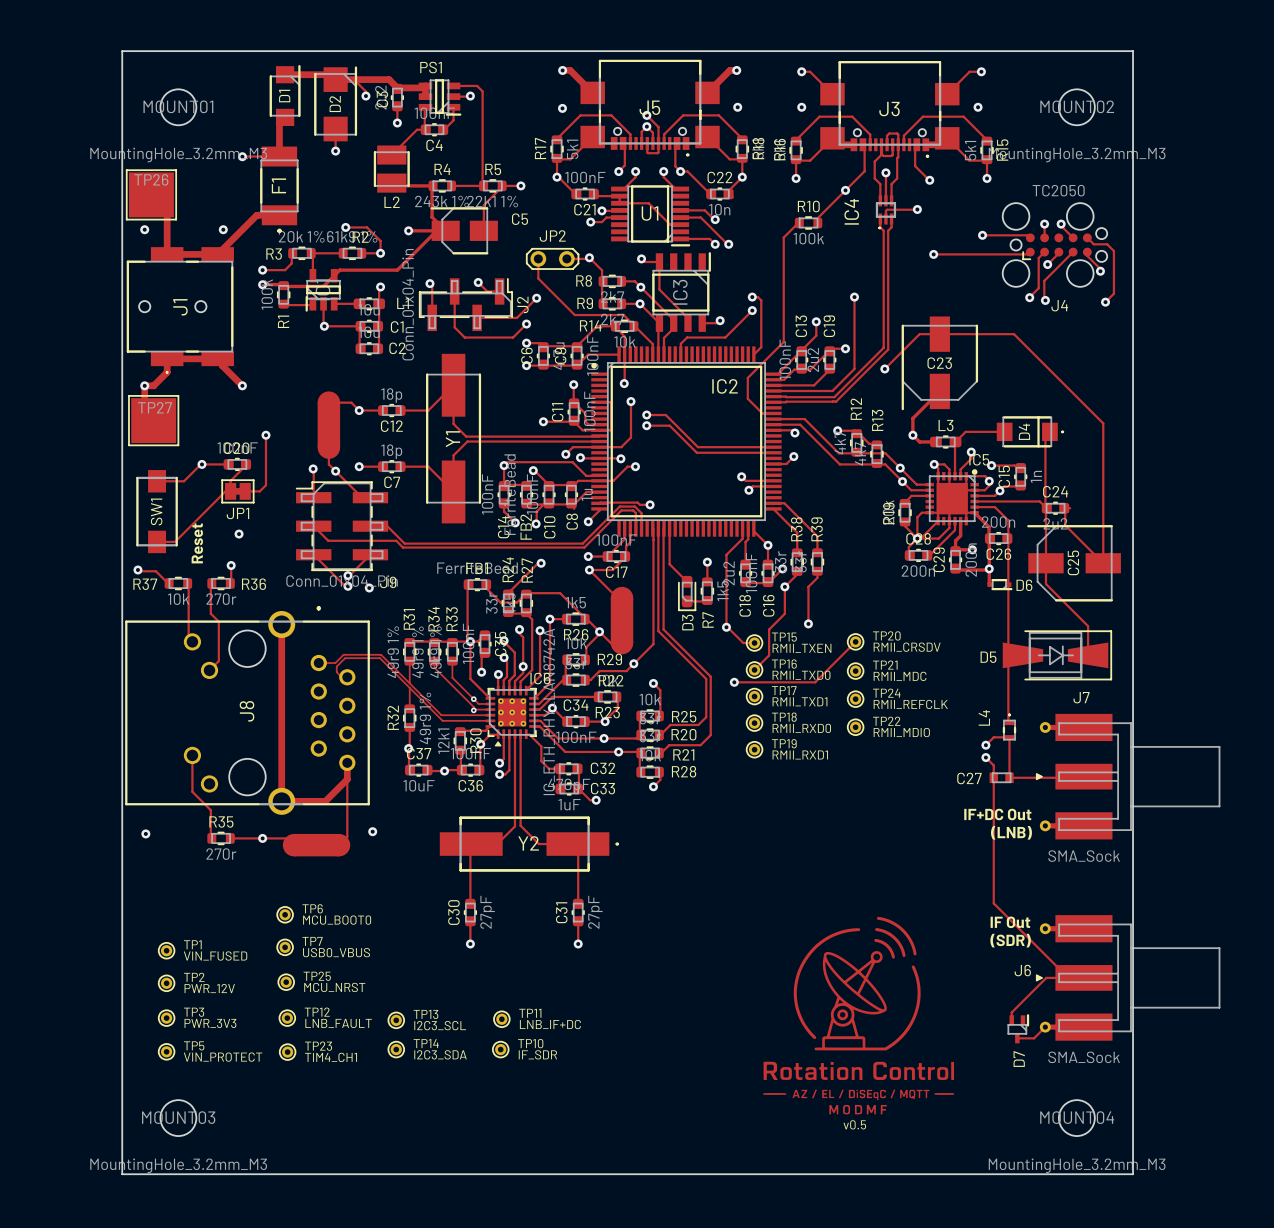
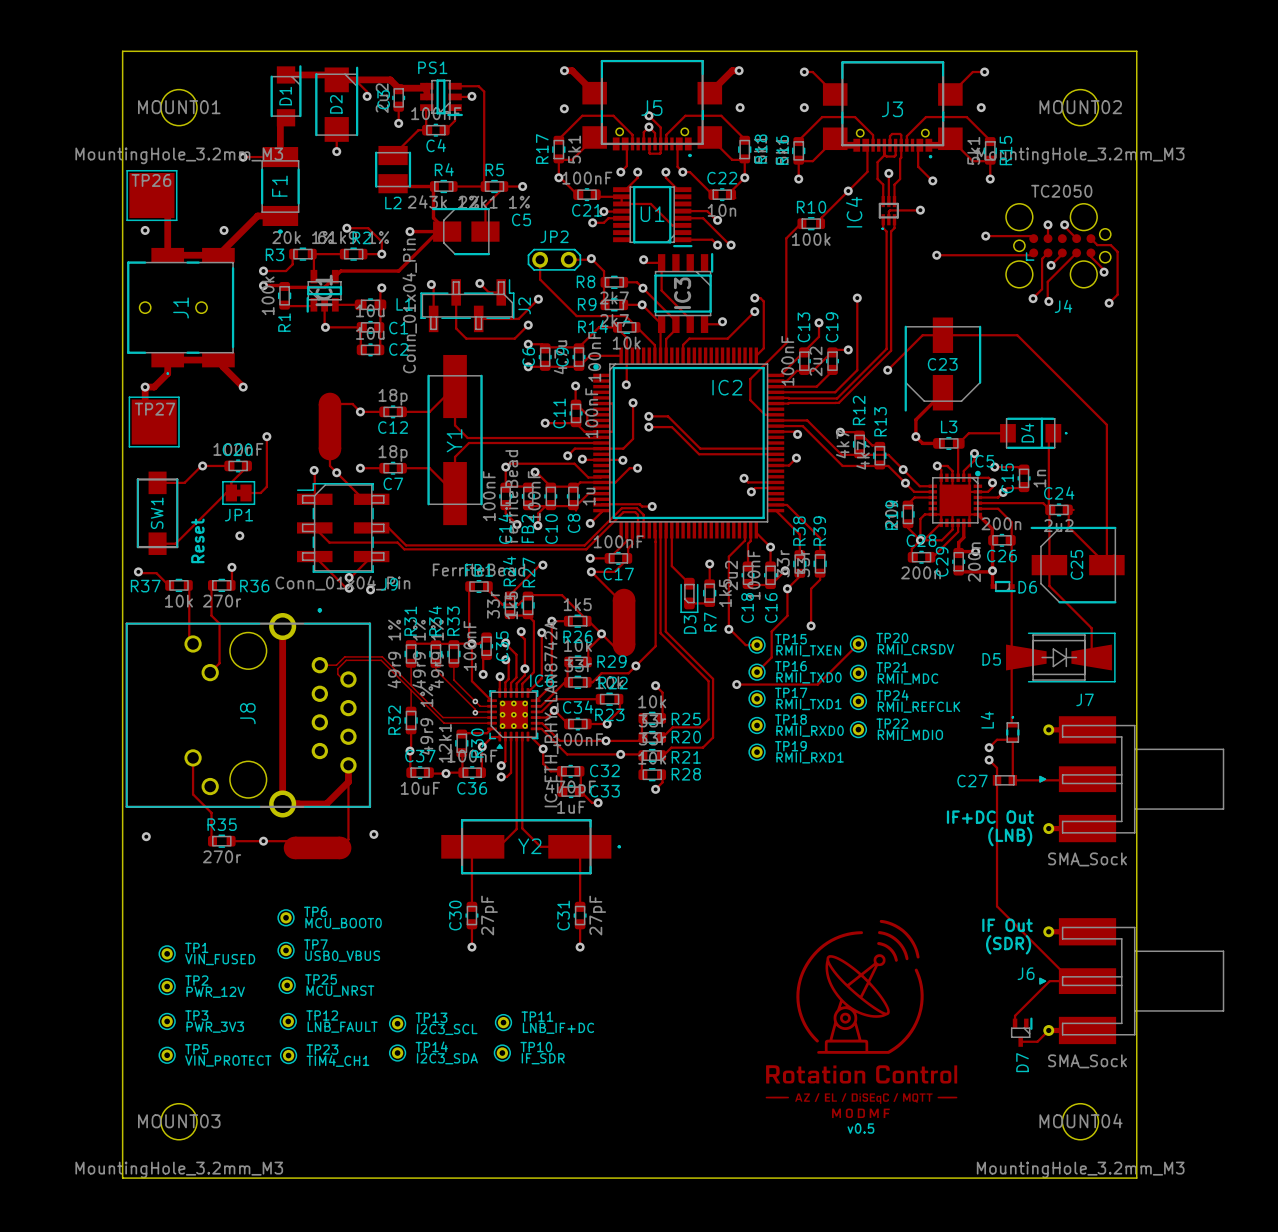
via: none -> (543, 748)

